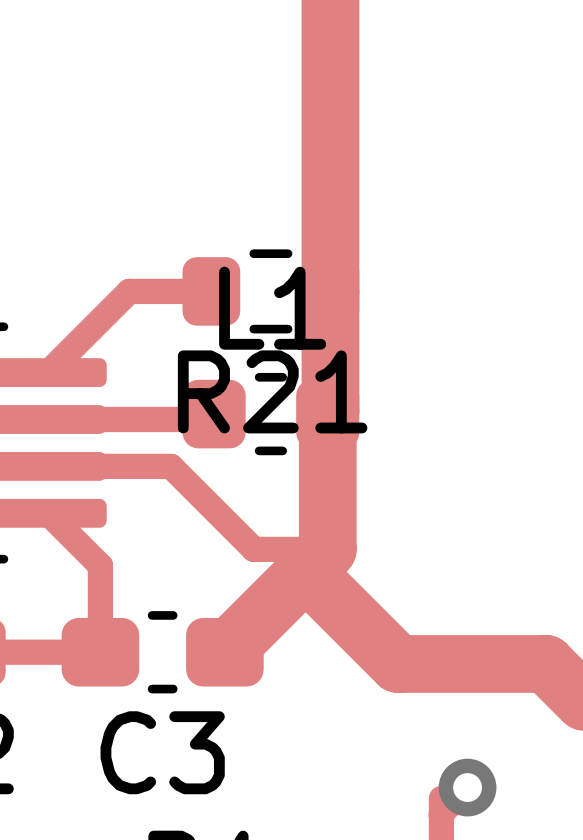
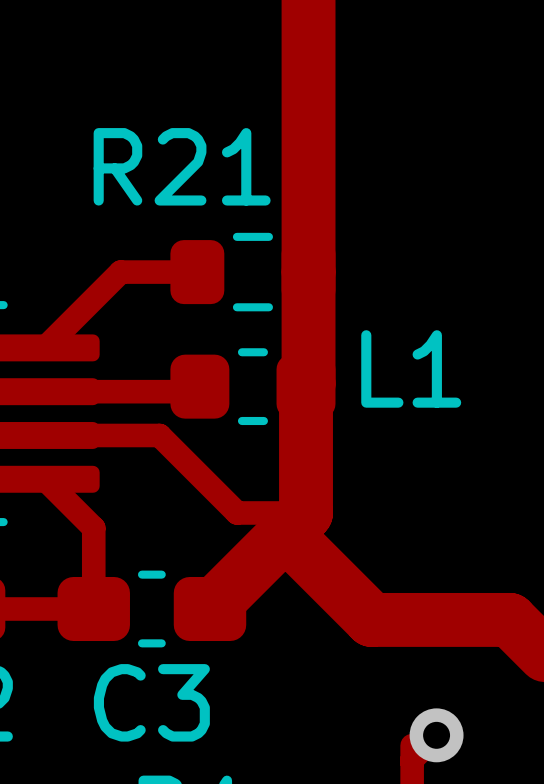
L1 name position: L1 (272, 308) -> L1 (411, 368)
R21 name position: R21 (272, 391) -> R21 (182, 166)

